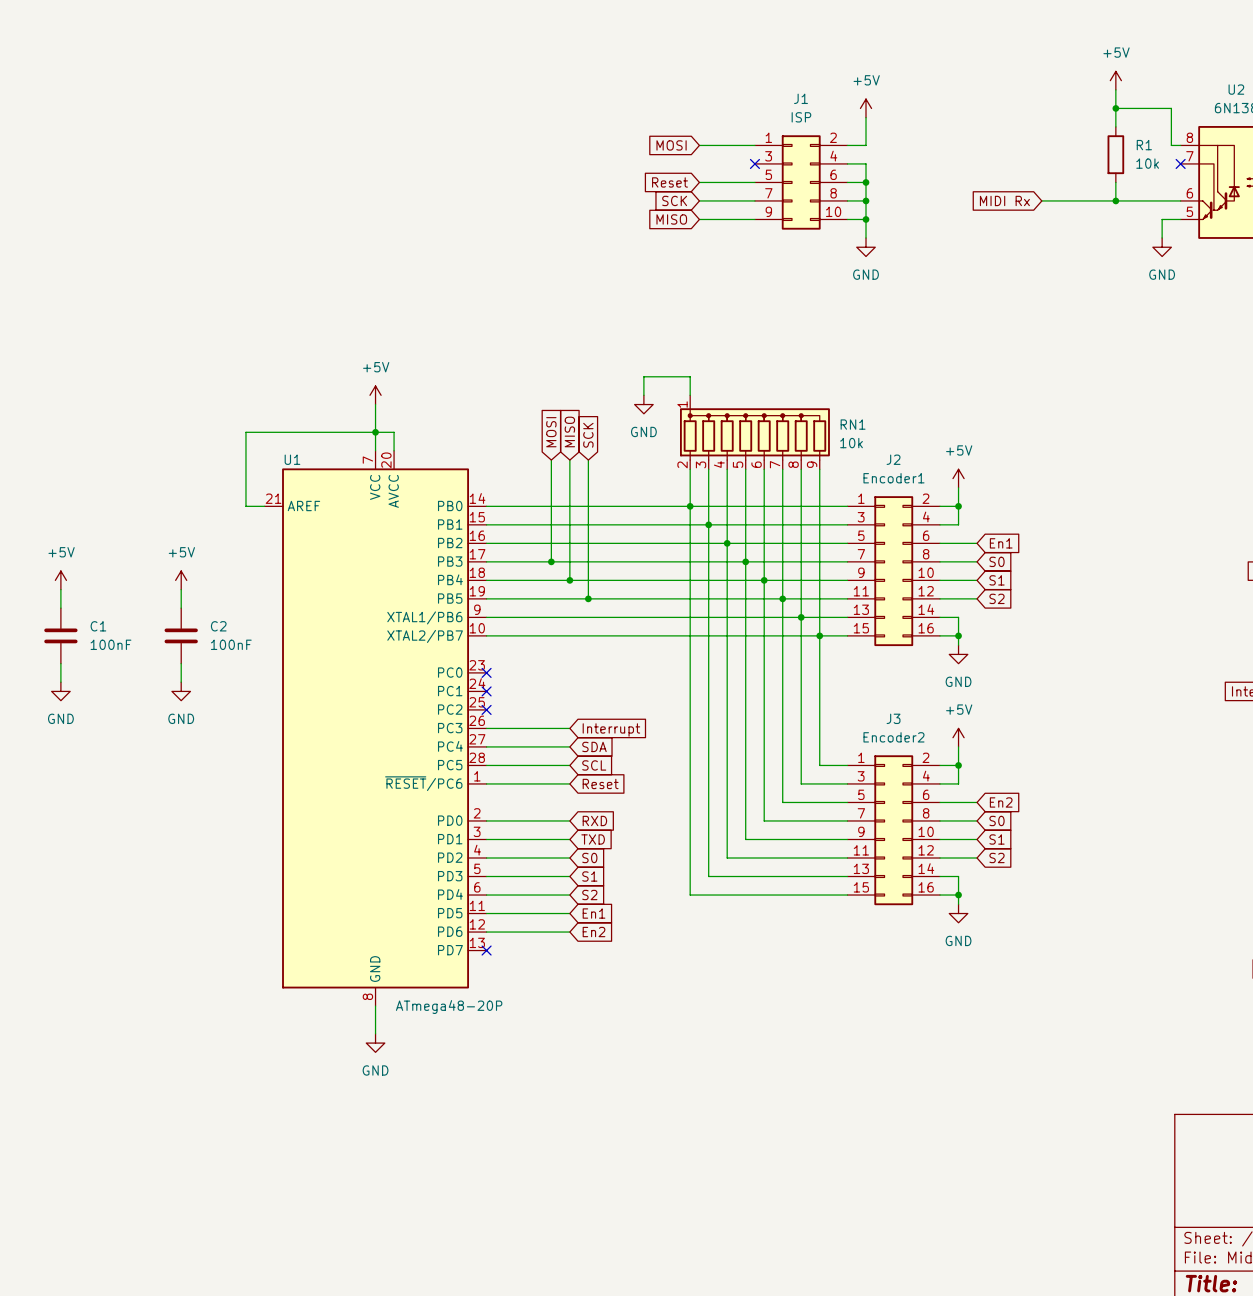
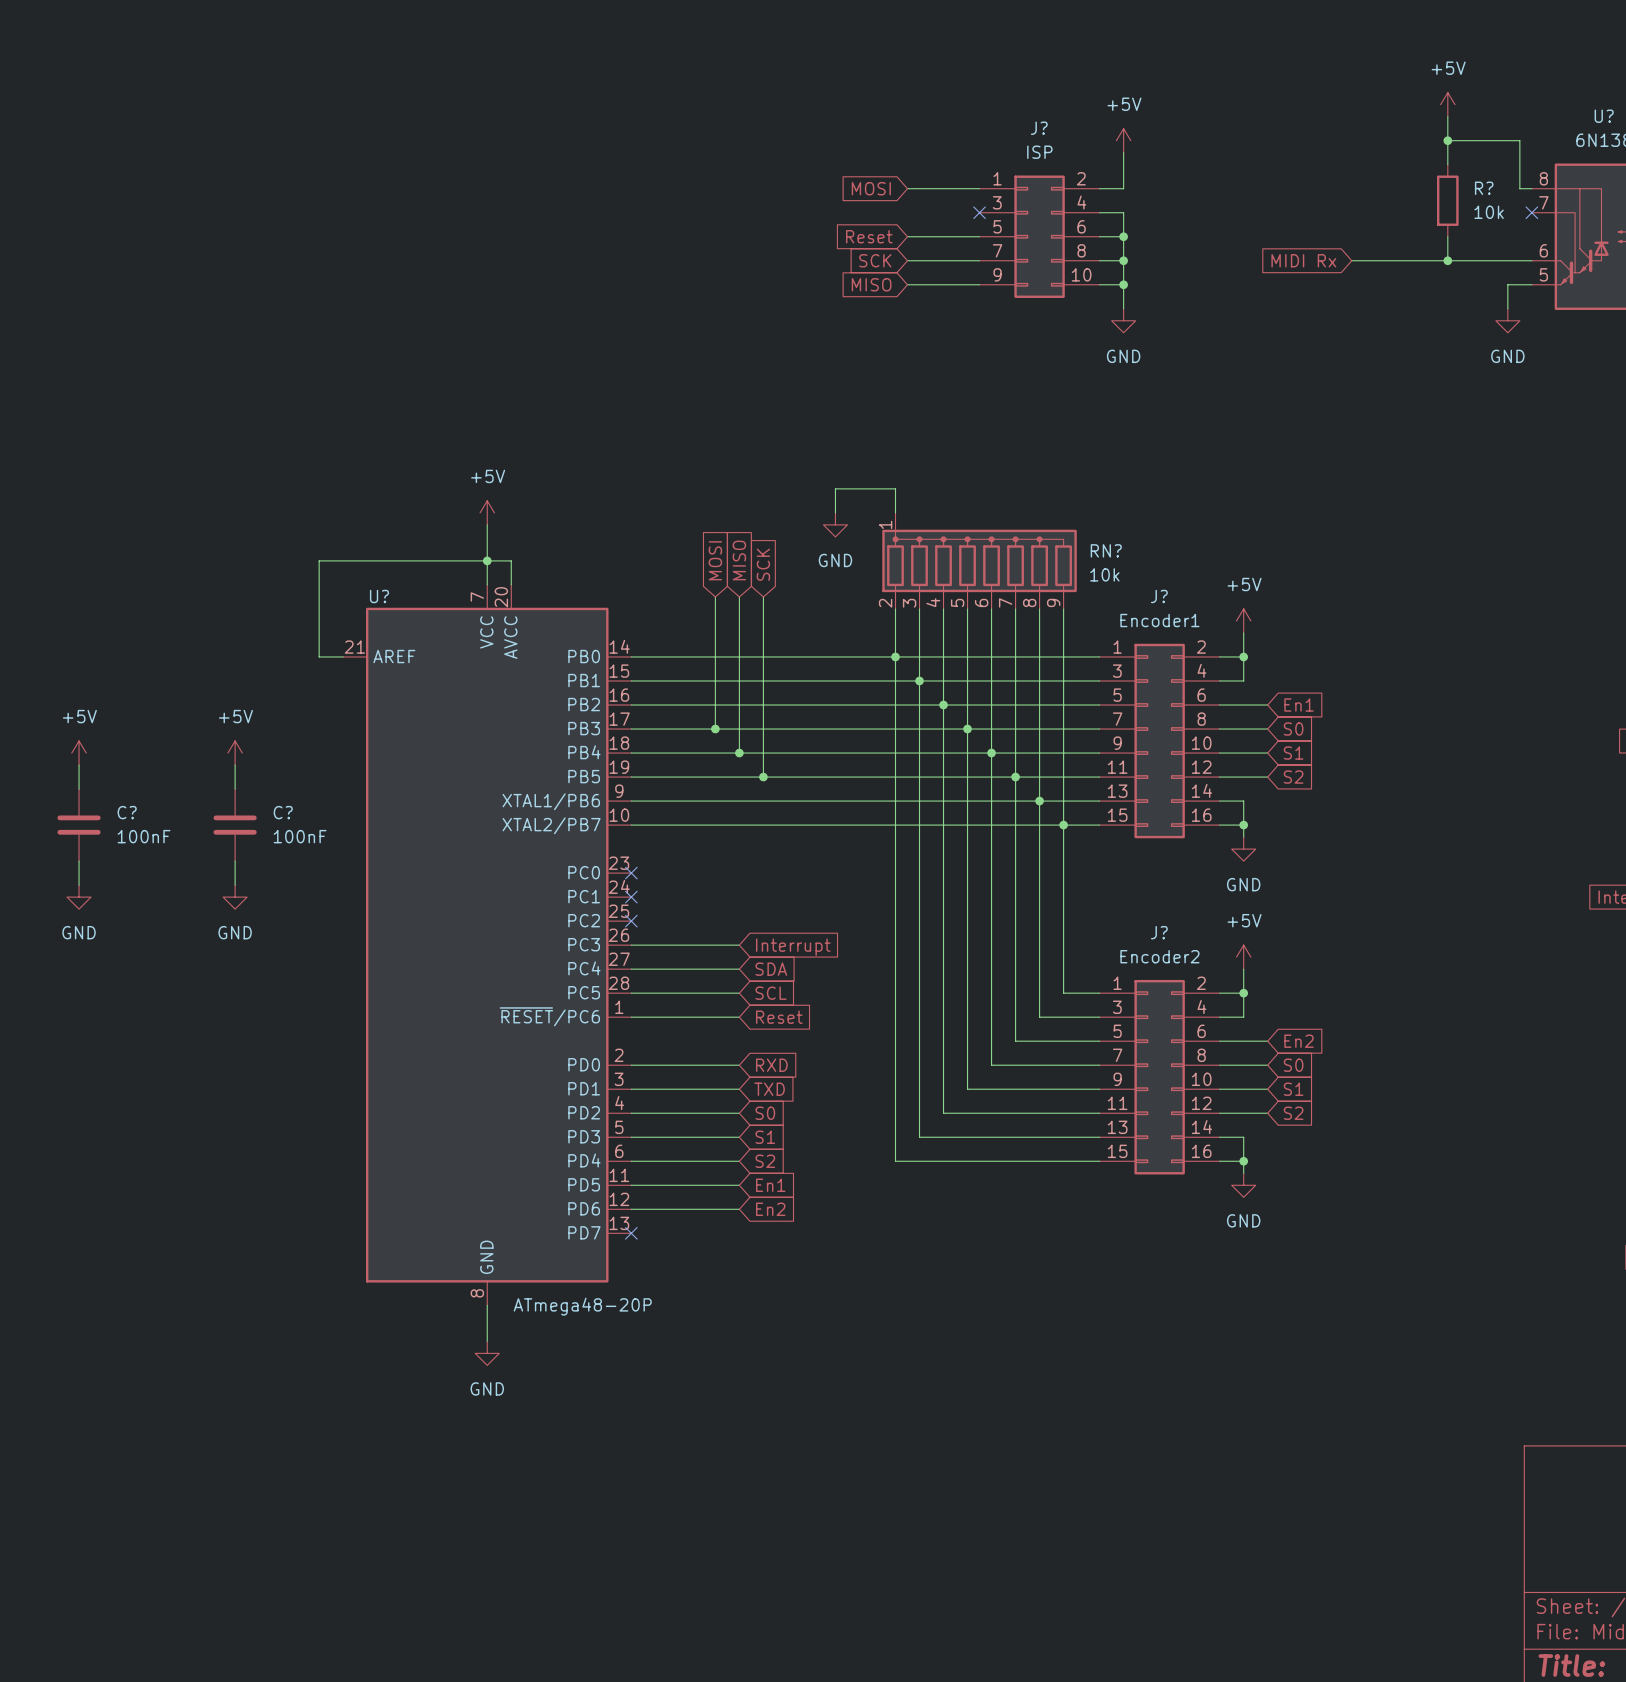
U2 name: U2 (1236, 89) -> U? (1604, 116)
J1 name: J1 (801, 98) -> J? (1039, 128)
R1 name: R1 (1144, 145) -> R? (1484, 188)
RN1 name: RN1 (853, 424) -> RN? (1106, 550)
U1 name: U1 (292, 459) -> U? (379, 596)
J2 name: J2 (893, 459) -> J? (1159, 596)
C1 name: C1 (98, 626) -> C? (127, 812)
C2 name: C2 (218, 626) -> C? (283, 812)
J3 name: J3 (893, 718) -> J? (1159, 932)

